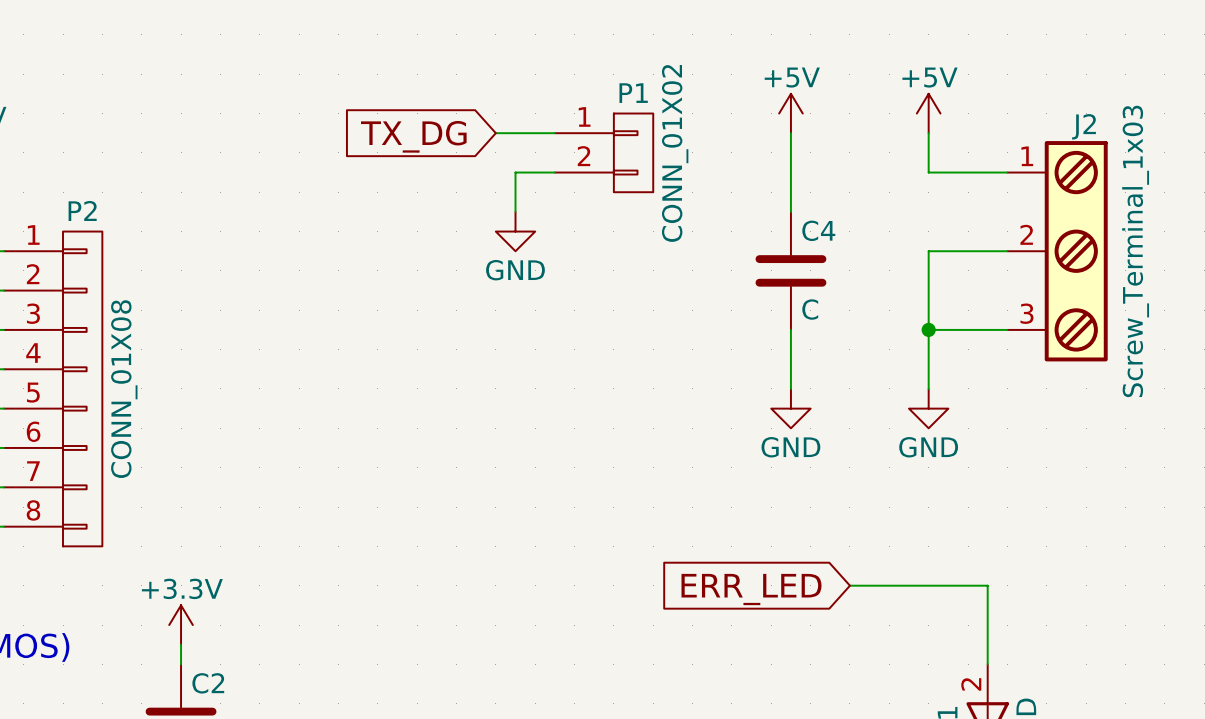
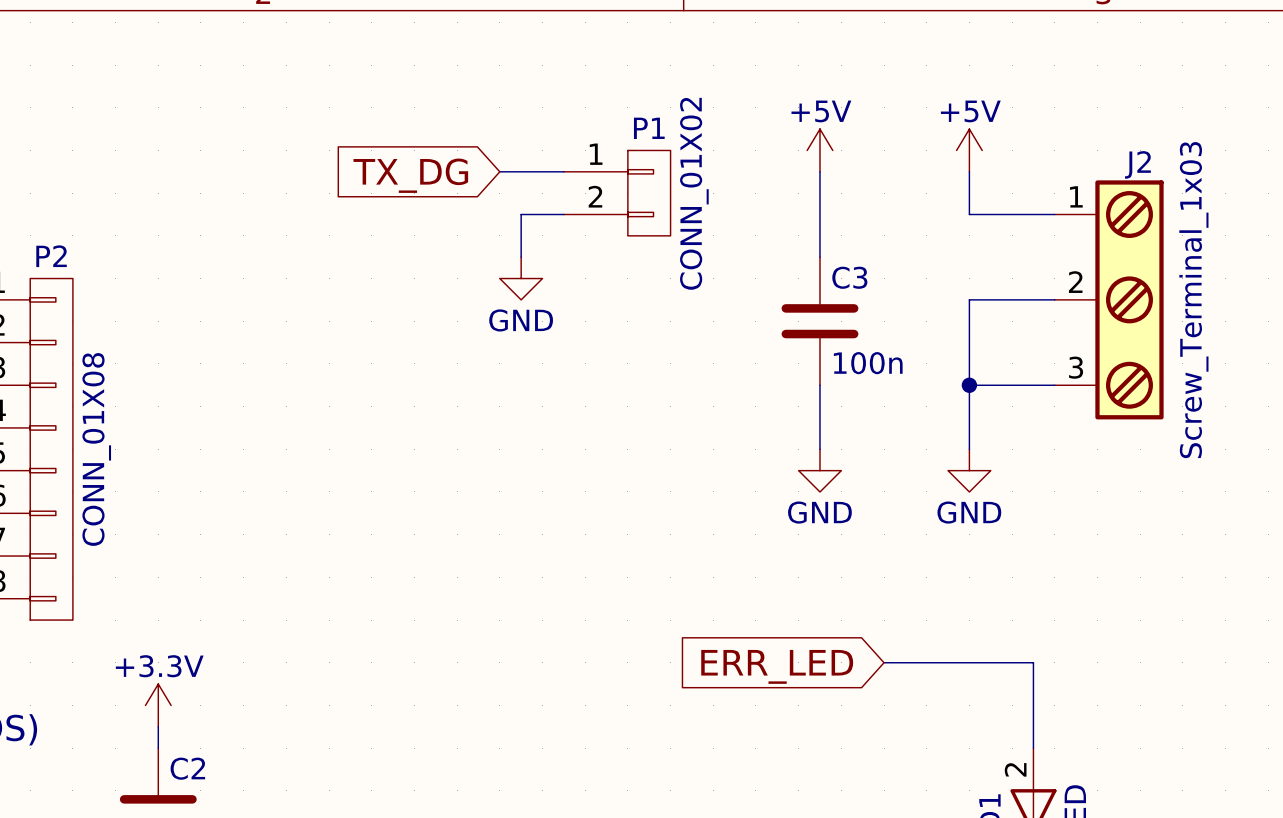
C4 name: C4 (818, 230) -> C3 (849, 277)
C4 value: C (810, 309) -> 100n (868, 363)

